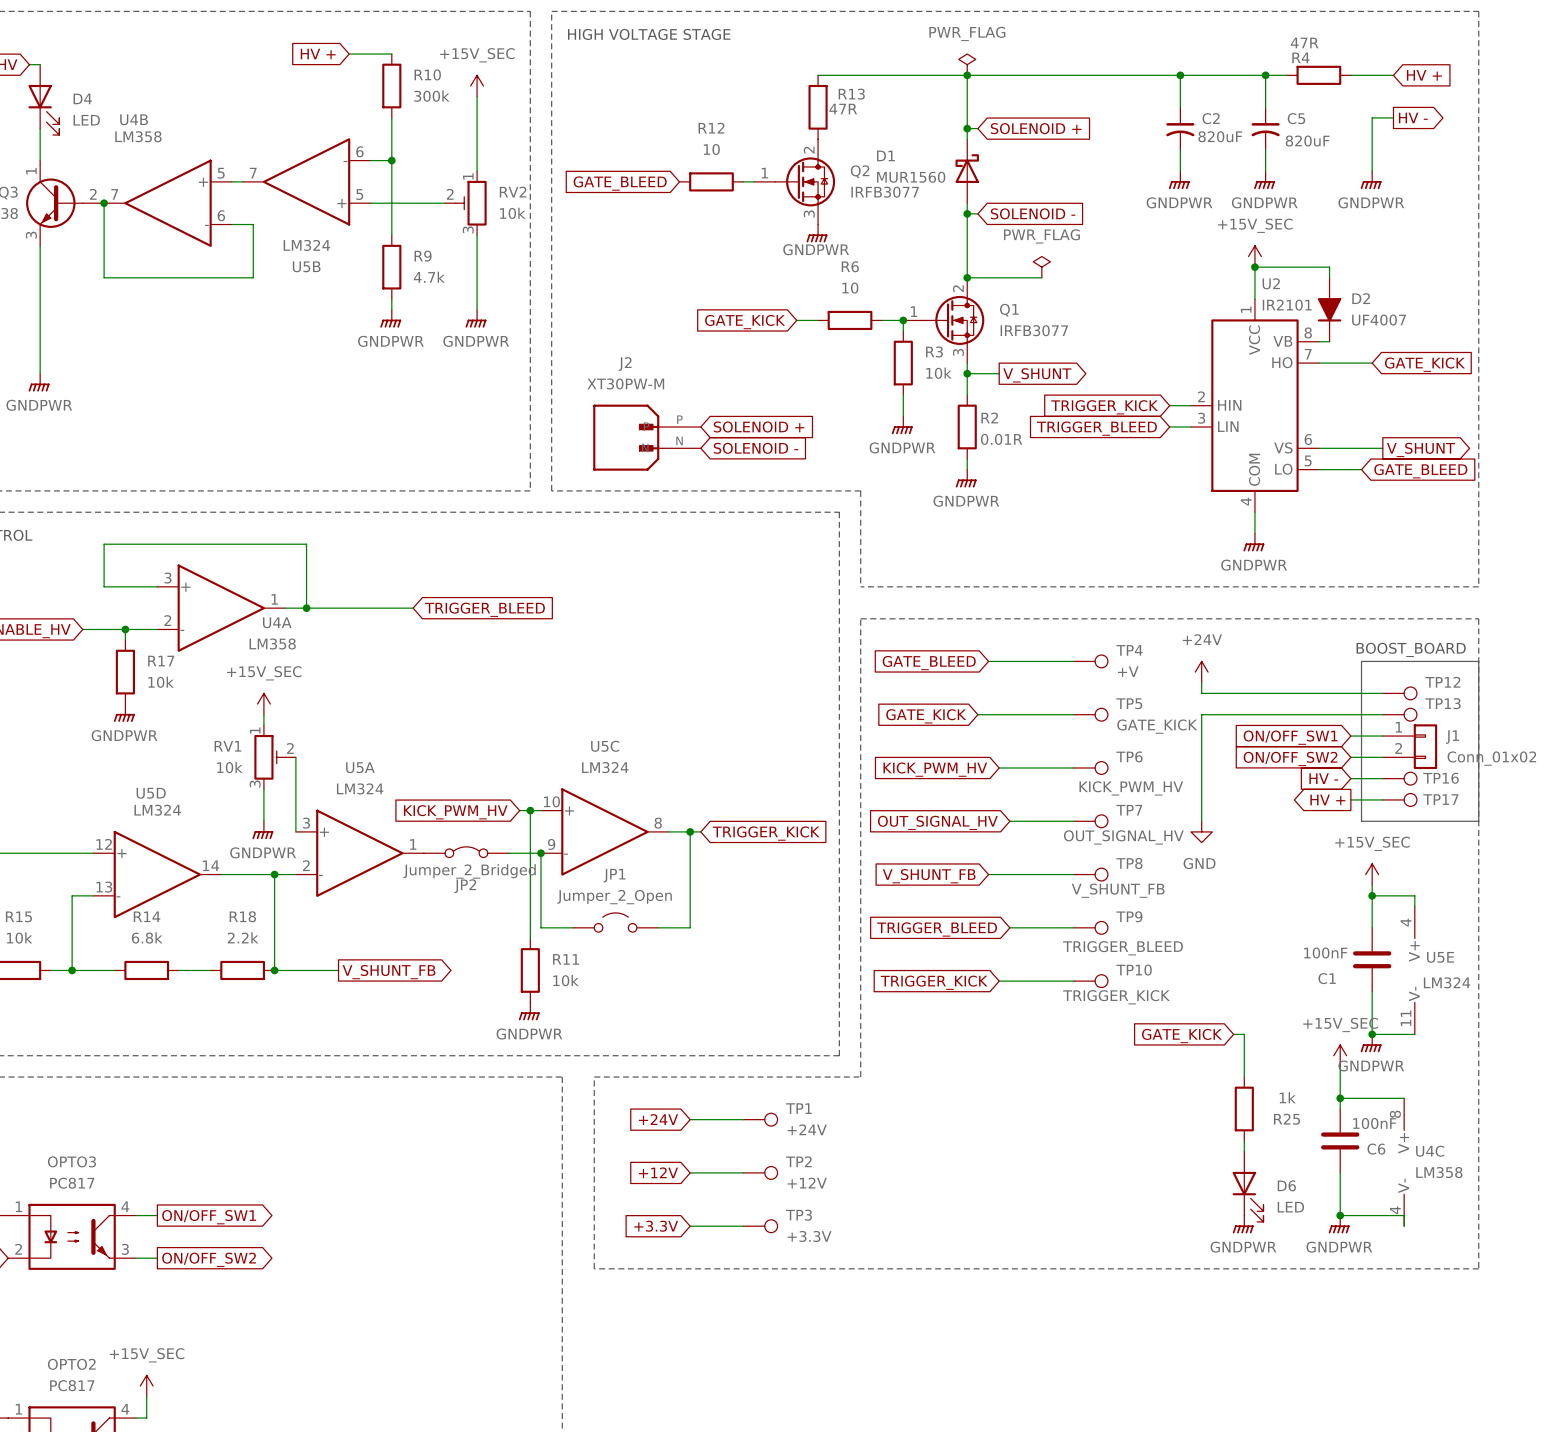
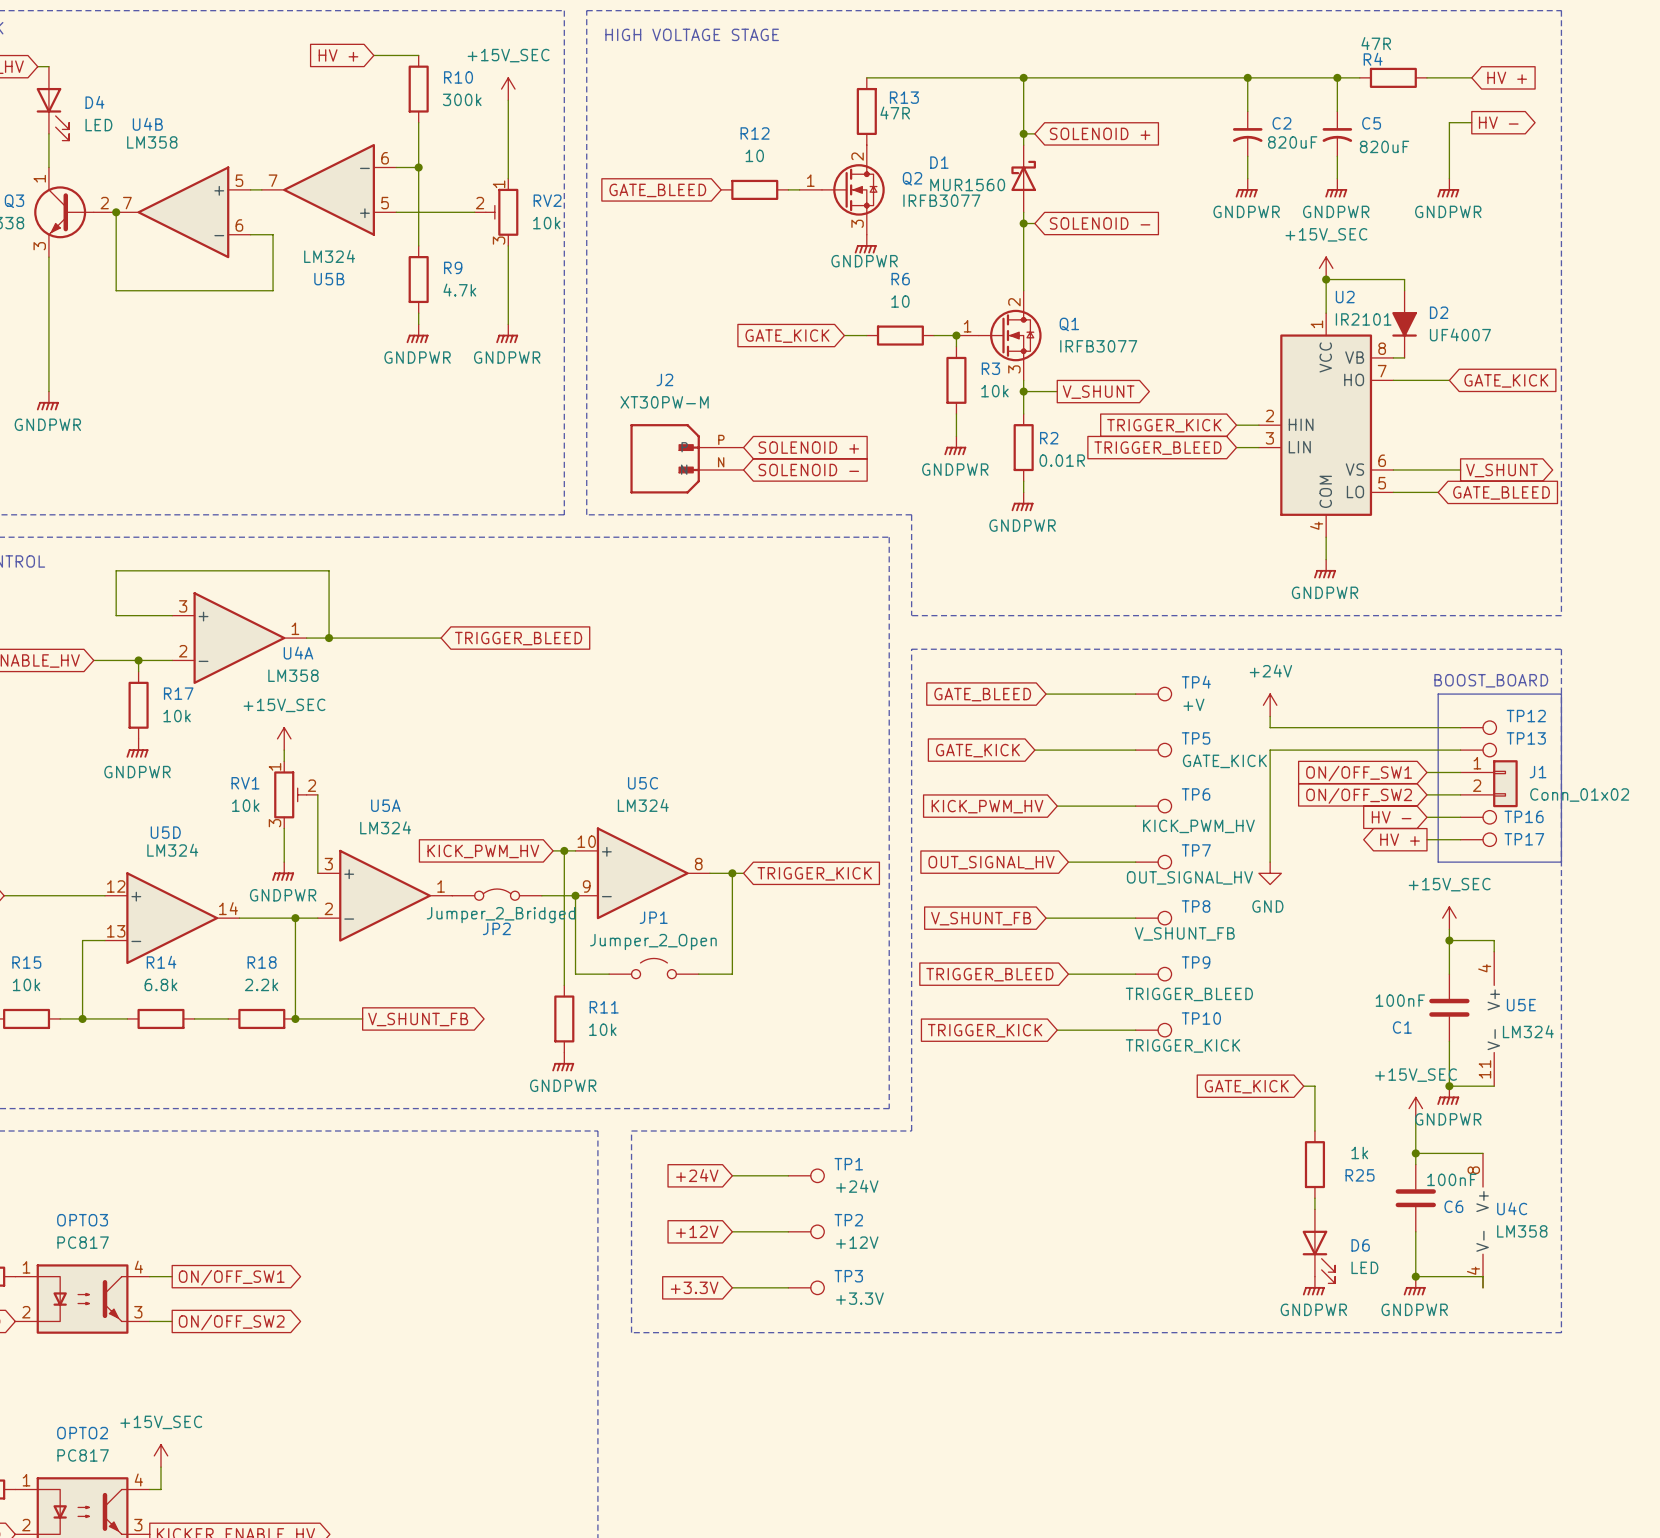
power symbol: PWR_FLAG (967, 64) -> none
power symbol: PWR_FLAG (1041, 267) -> none
wire: (967, 277) (1041, 277) -> none
junction: (967, 277) -> none

